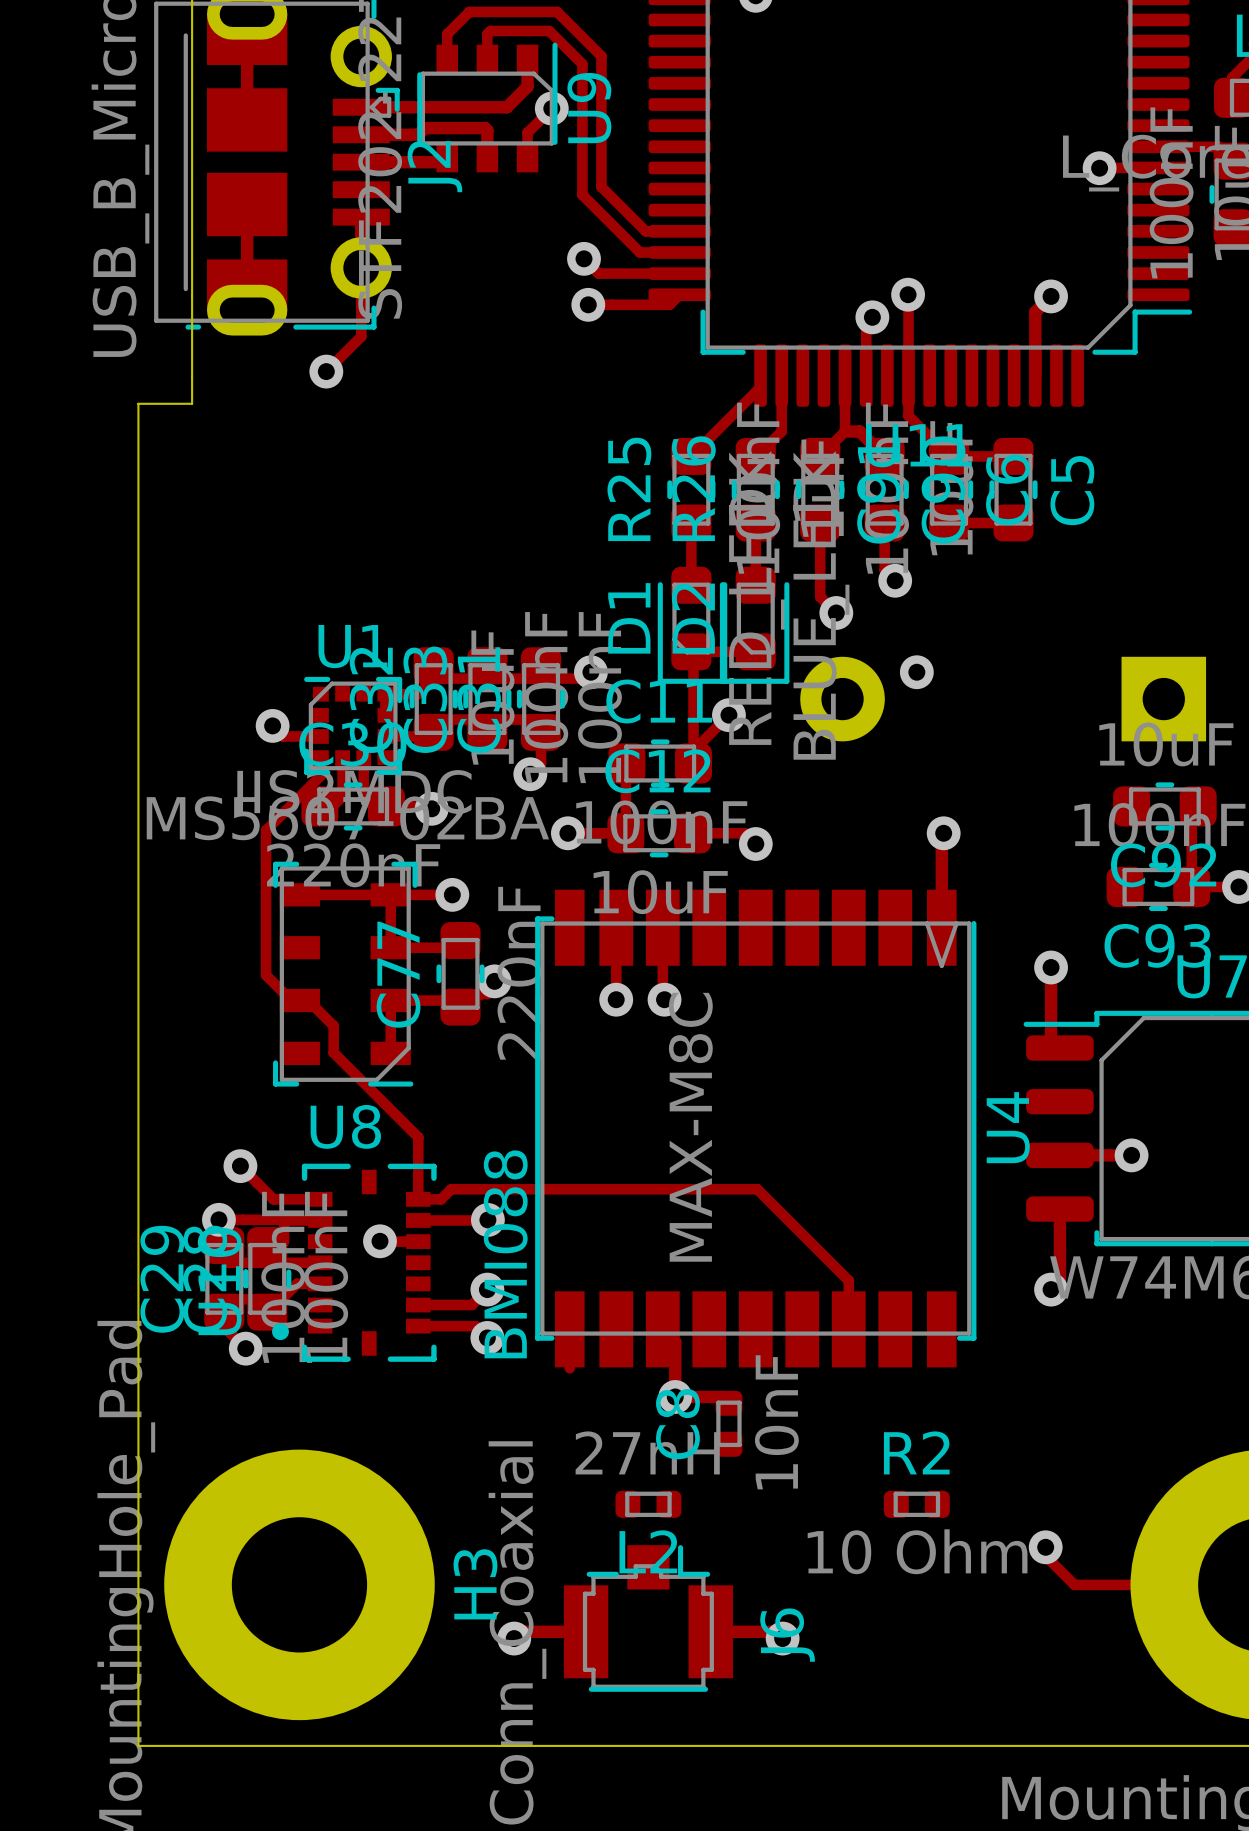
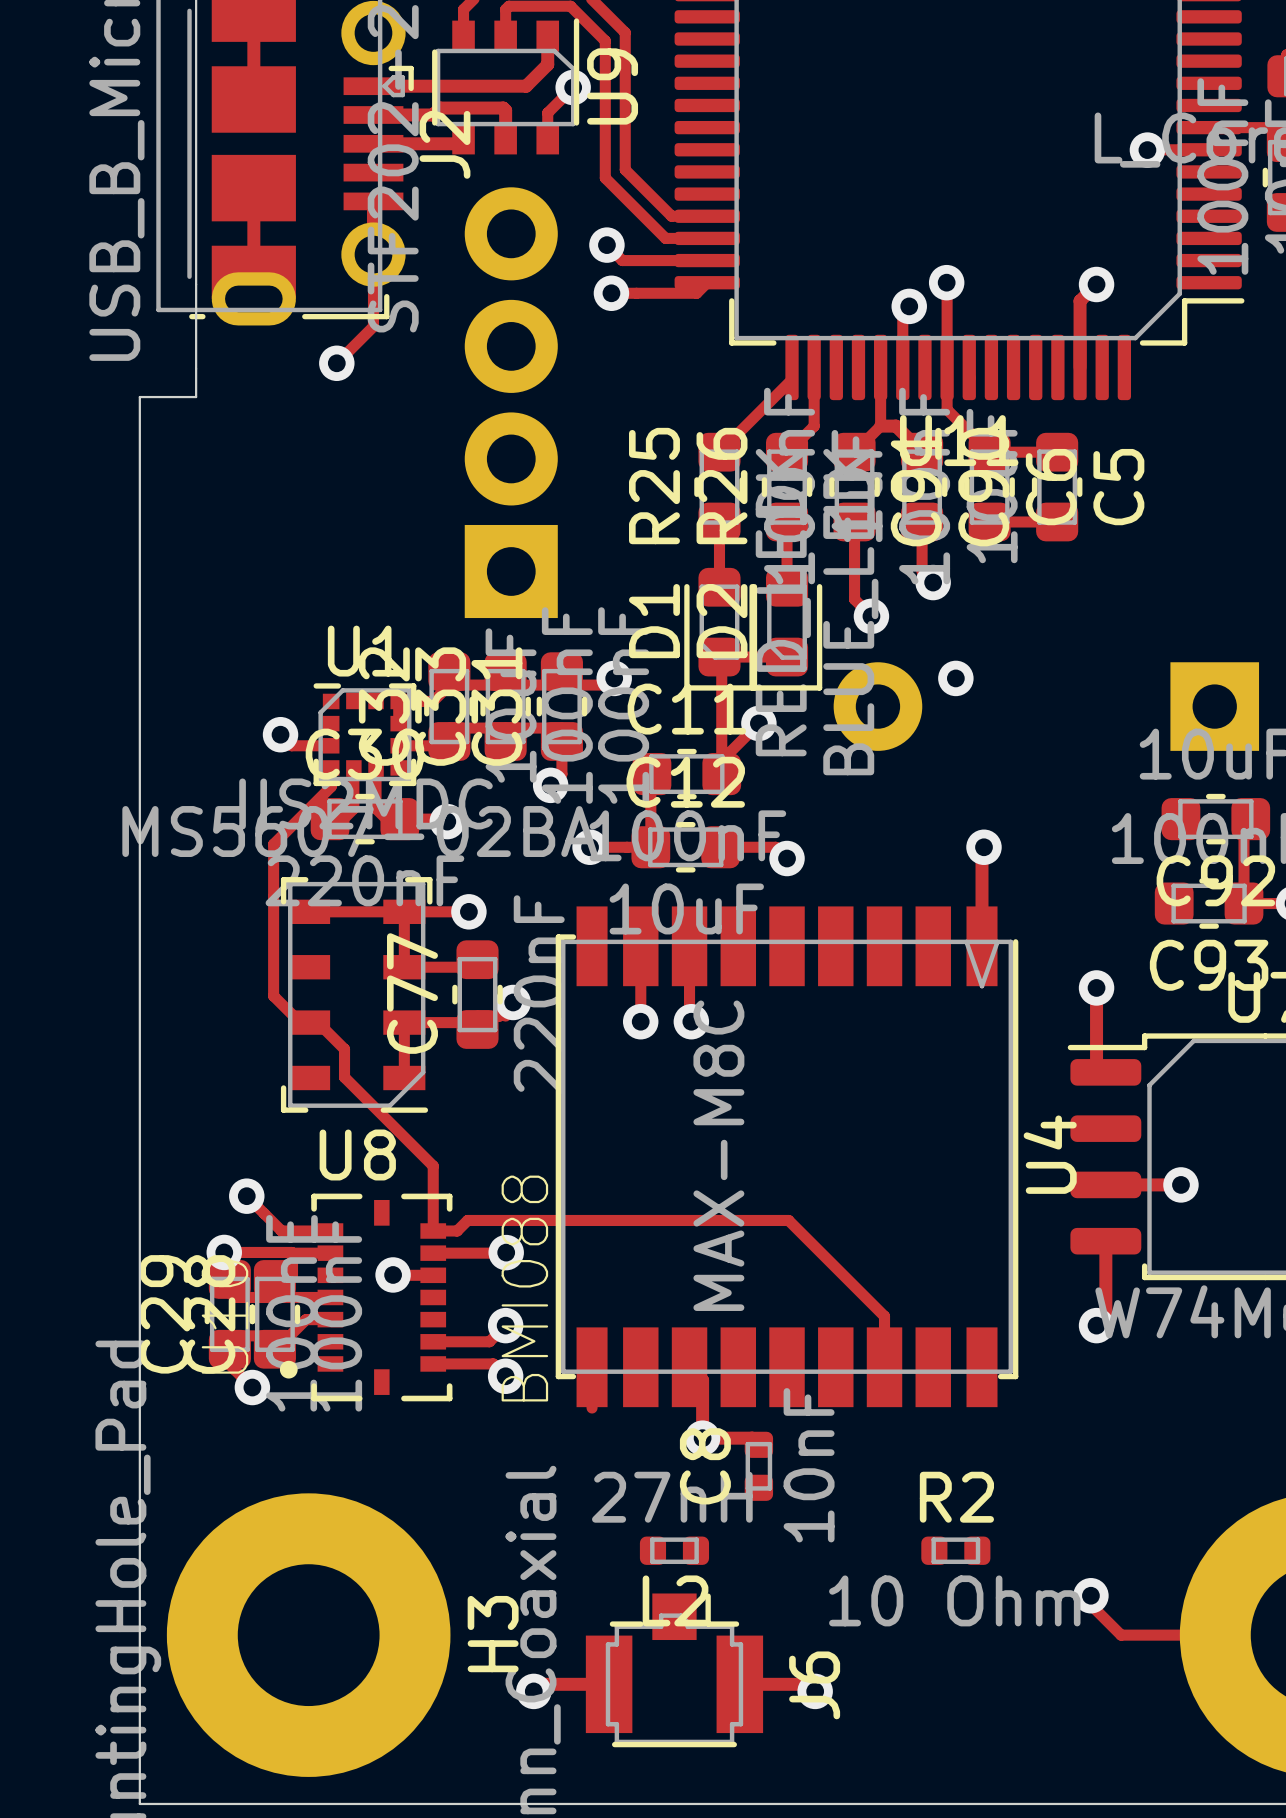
part: none -> (511, 402)

